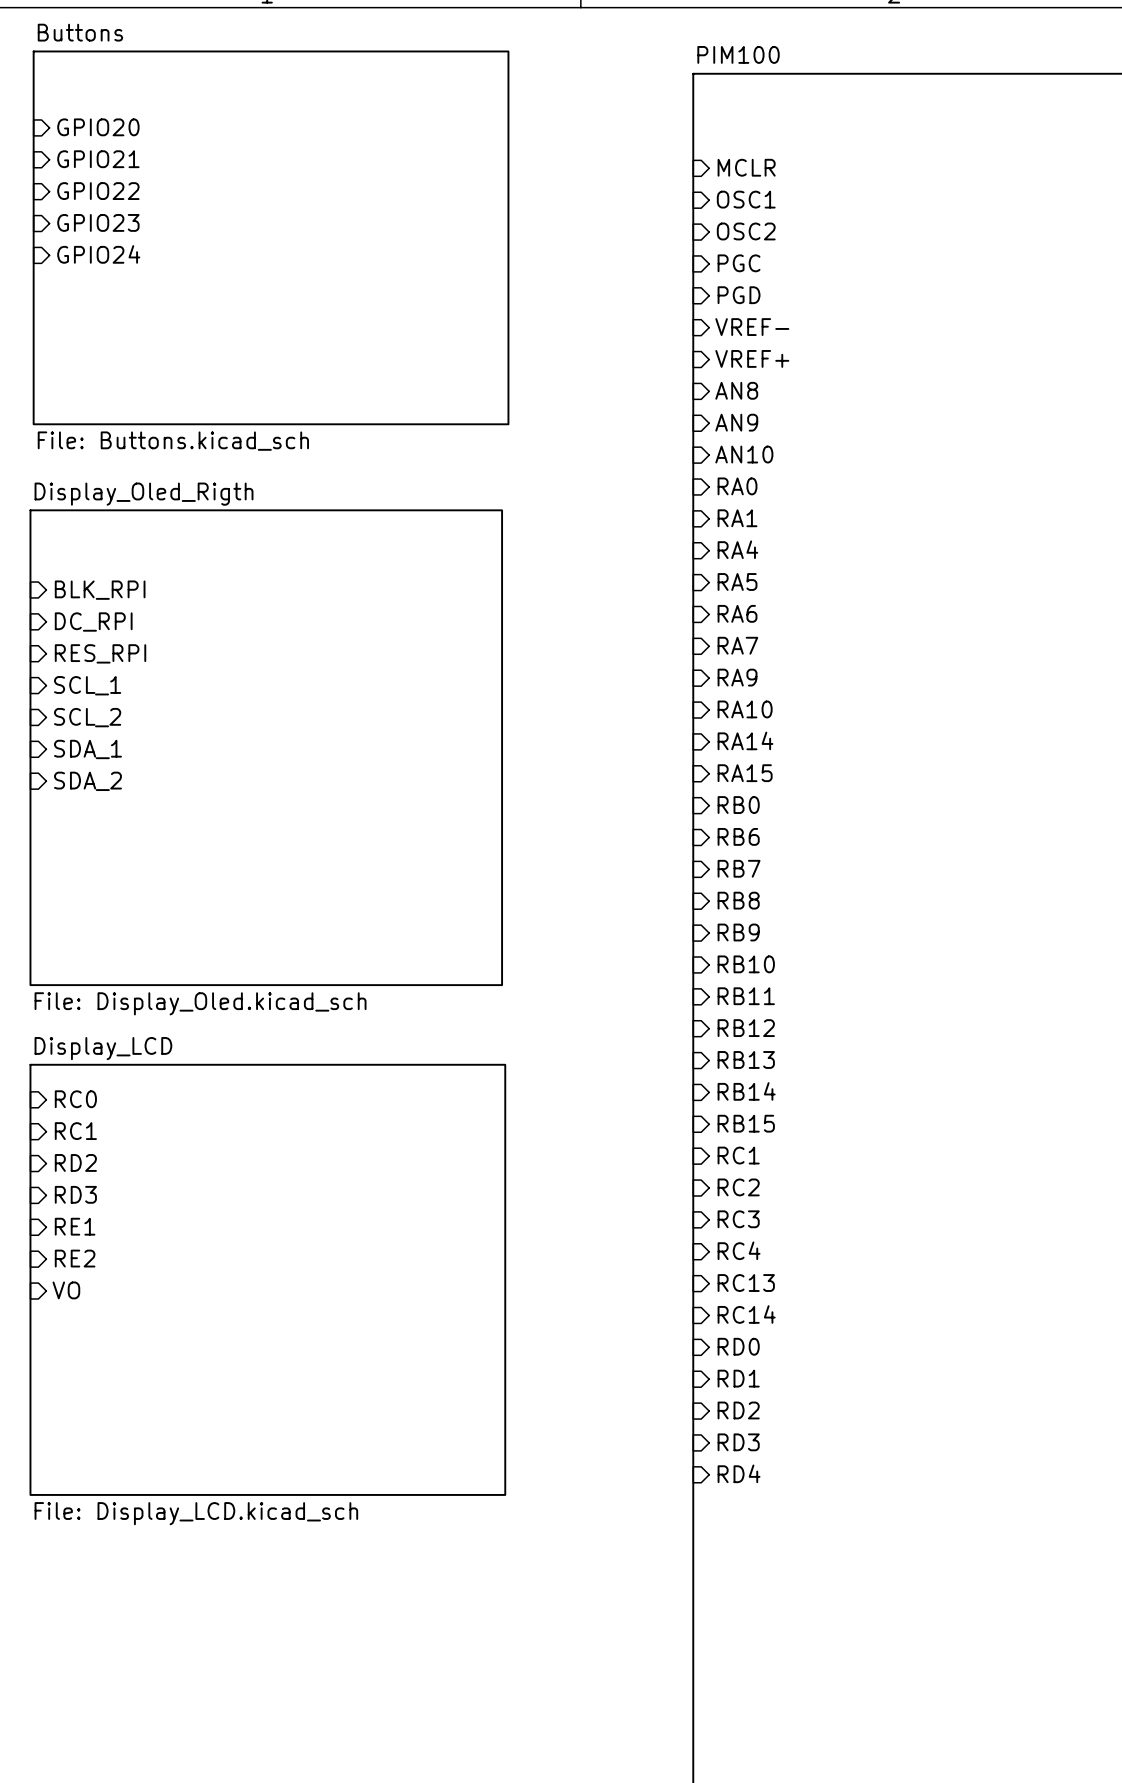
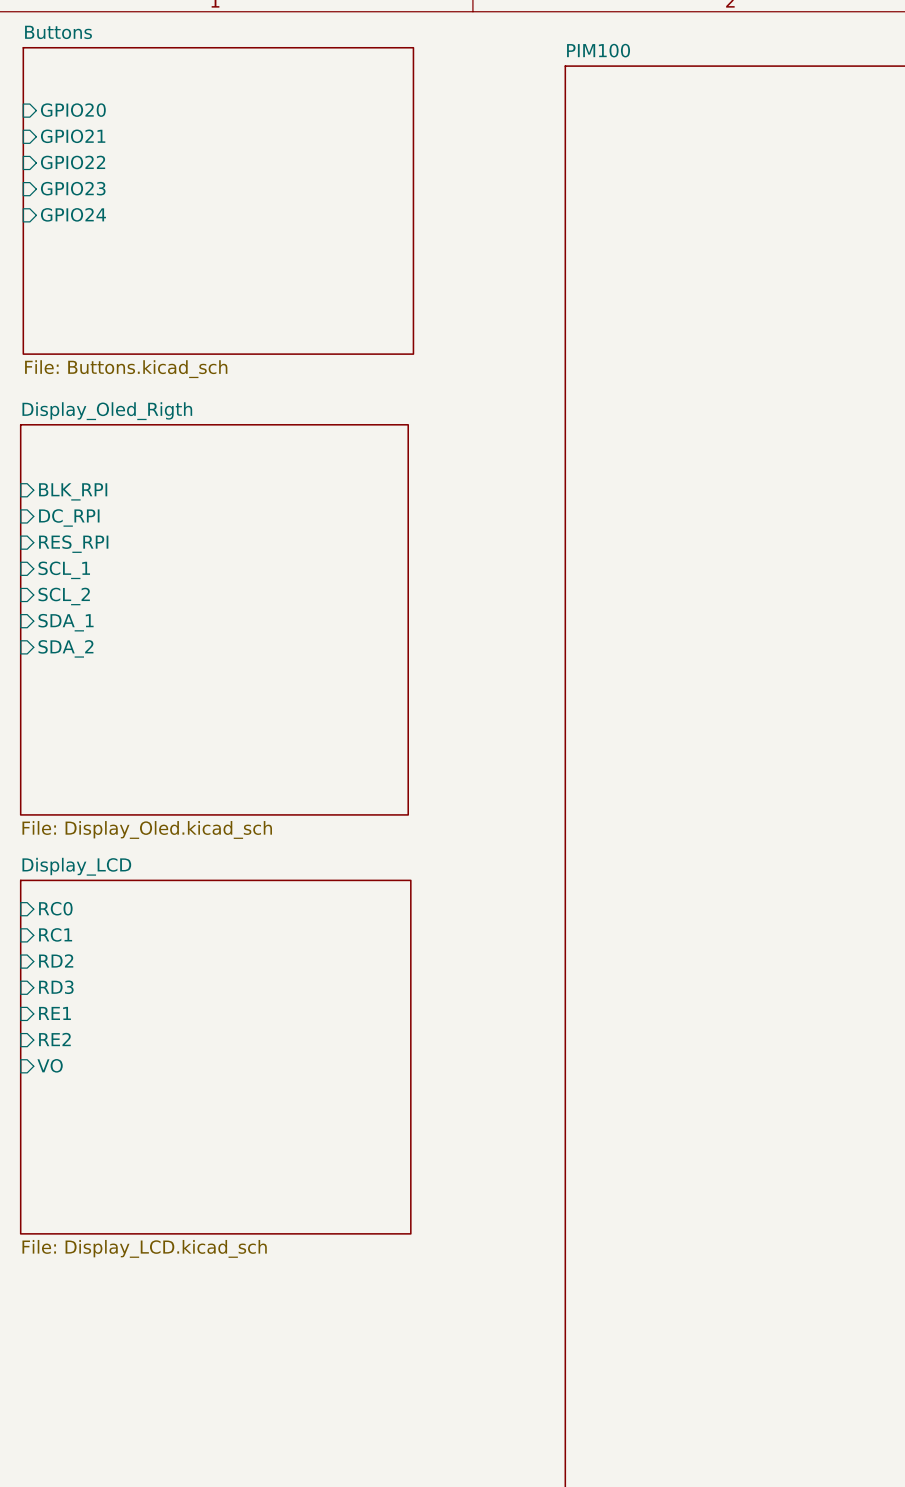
sheet pin: MCLR (746, 167) -> none
sheet pin: OSC1 (746, 199) -> none
sheet pin: OSC2 (746, 231) -> none
sheet pin: PGC (739, 263) -> none
sheet pin: PGD (739, 295) -> none
sheet pin: VREF- (752, 327) -> none
sheet pin: VREF+ (752, 358) -> none
sheet pin: AN8 (736, 390) -> none
sheet pin: AN9 (736, 422) -> none
sheet pin: AN10 (744, 454) -> none
sheet pin: RA0 (737, 486) -> none
sheet pin: RA1 (737, 518) -> none
sheet pin: RA4 (737, 549) -> none
sheet pin: RA5 (737, 581) -> none
sheet pin: RA6 (737, 613) -> none
sheet pin: RA7 (737, 645) -> none
sheet pin: RA9 (737, 677) -> none
sheet pin: RA10 (745, 709) -> none
sheet pin: RA14 (745, 740) -> none
sheet pin: RA15 (745, 773) -> none
sheet pin: RB0 (738, 805) -> none
sheet pin: RB6 (738, 836) -> none
sheet pin: RB7 (739, 868) -> none
sheet pin: RB8 (738, 900) -> none
sheet pin: RB9 (738, 932) -> none
sheet pin: RB10 (746, 964) -> none
sheet pin: RB11 (746, 996) -> none
sheet pin: RB12 (746, 1028) -> none
sheet pin: RB13 (746, 1059) -> none
sheet pin: RB14 (746, 1091) -> none
sheet pin: RB15 (746, 1123) -> none
sheet pin: RC1 (738, 1155) -> none
sheet pin: RC2 (738, 1187) -> none
sheet pin: RC3 (738, 1219) -> none
sheet pin: RC4 (739, 1250) -> none
sheet pin: RC13 (746, 1283) -> none
sheet pin: RC14 (746, 1314) -> none
sheet pin: RD0 (738, 1346) -> none
sheet pin: RD1 (738, 1378) -> none
sheet pin: RD2 (738, 1410) -> none
sheet pin: RD3 (738, 1442) -> none
sheet pin: RD4 (739, 1473) -> none

